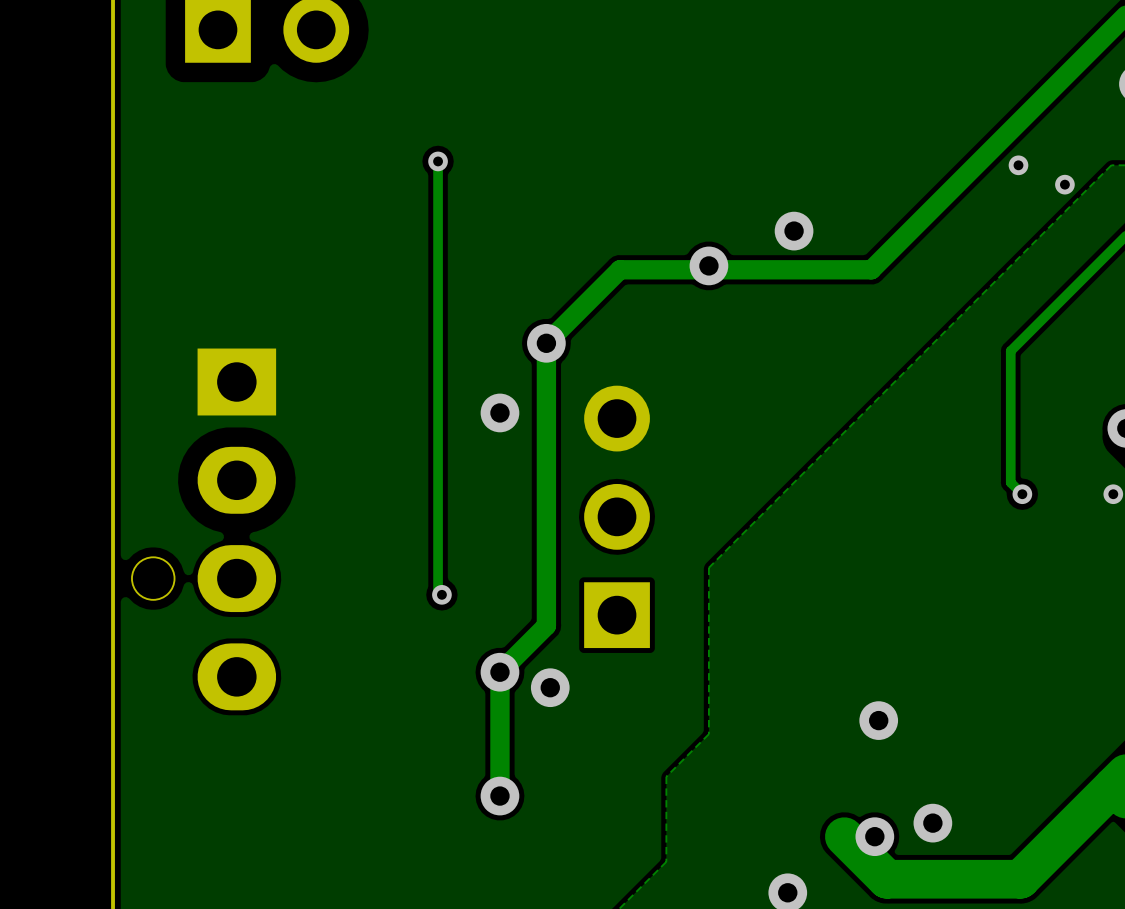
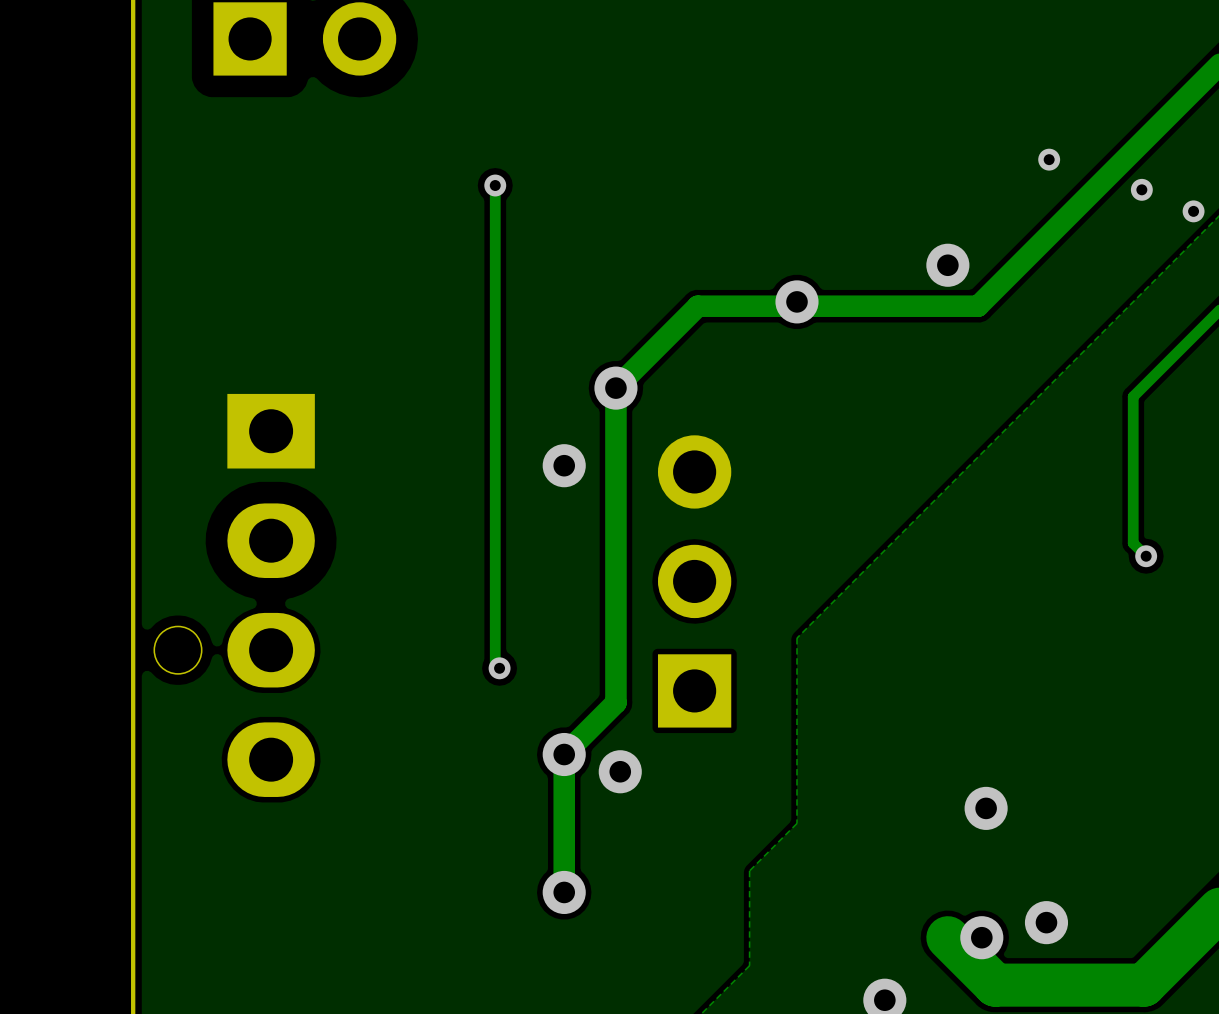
via: none -> (1049, 159)
via position: (794, 231) -> (947, 265)

